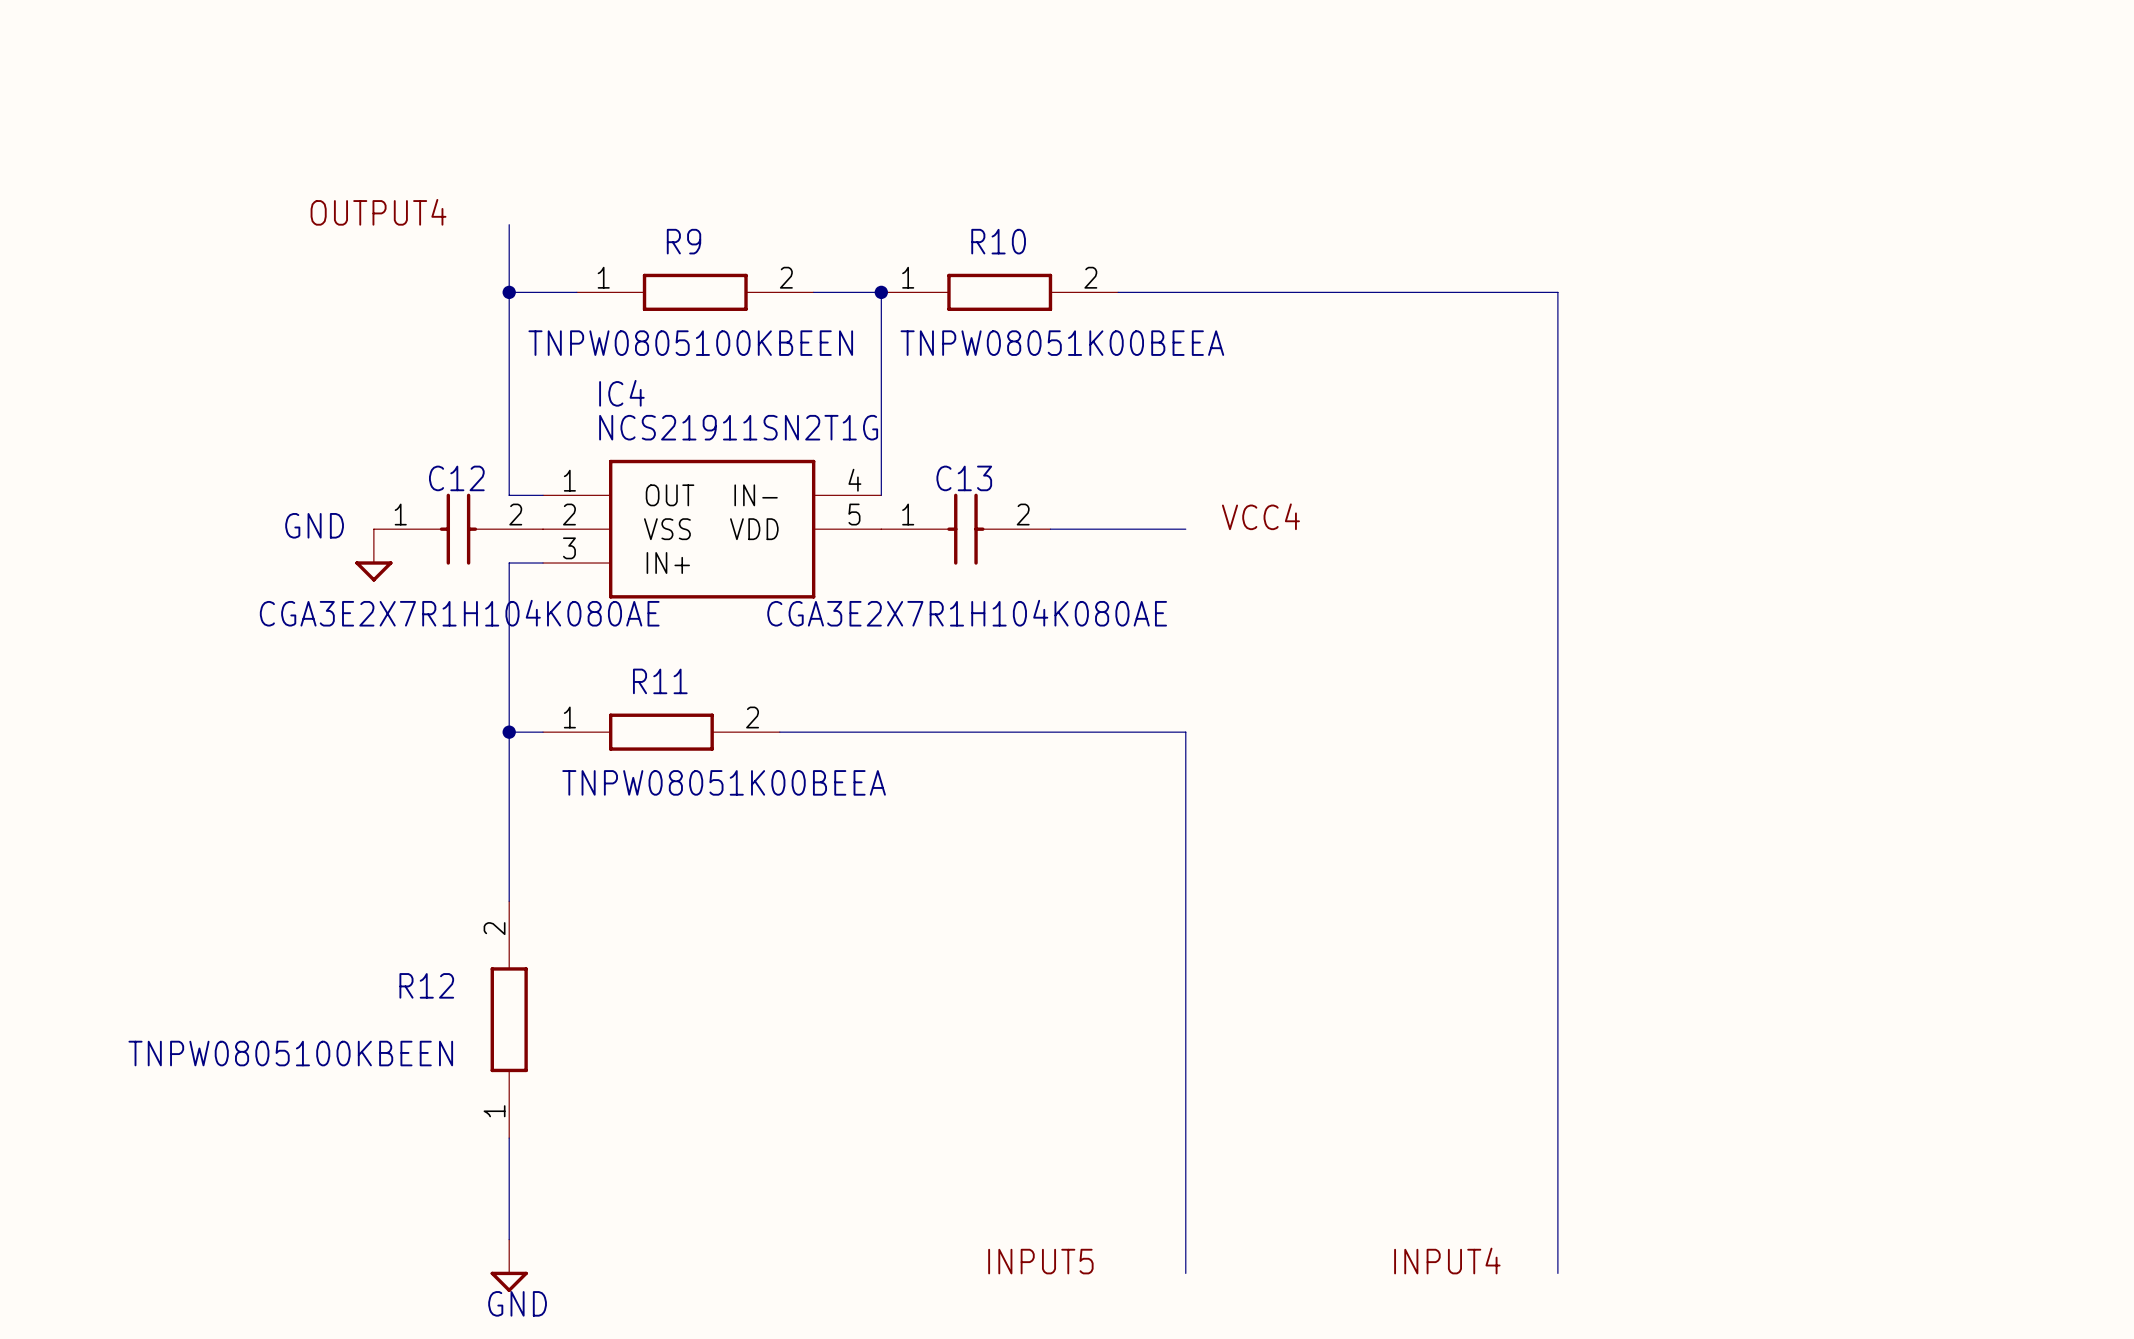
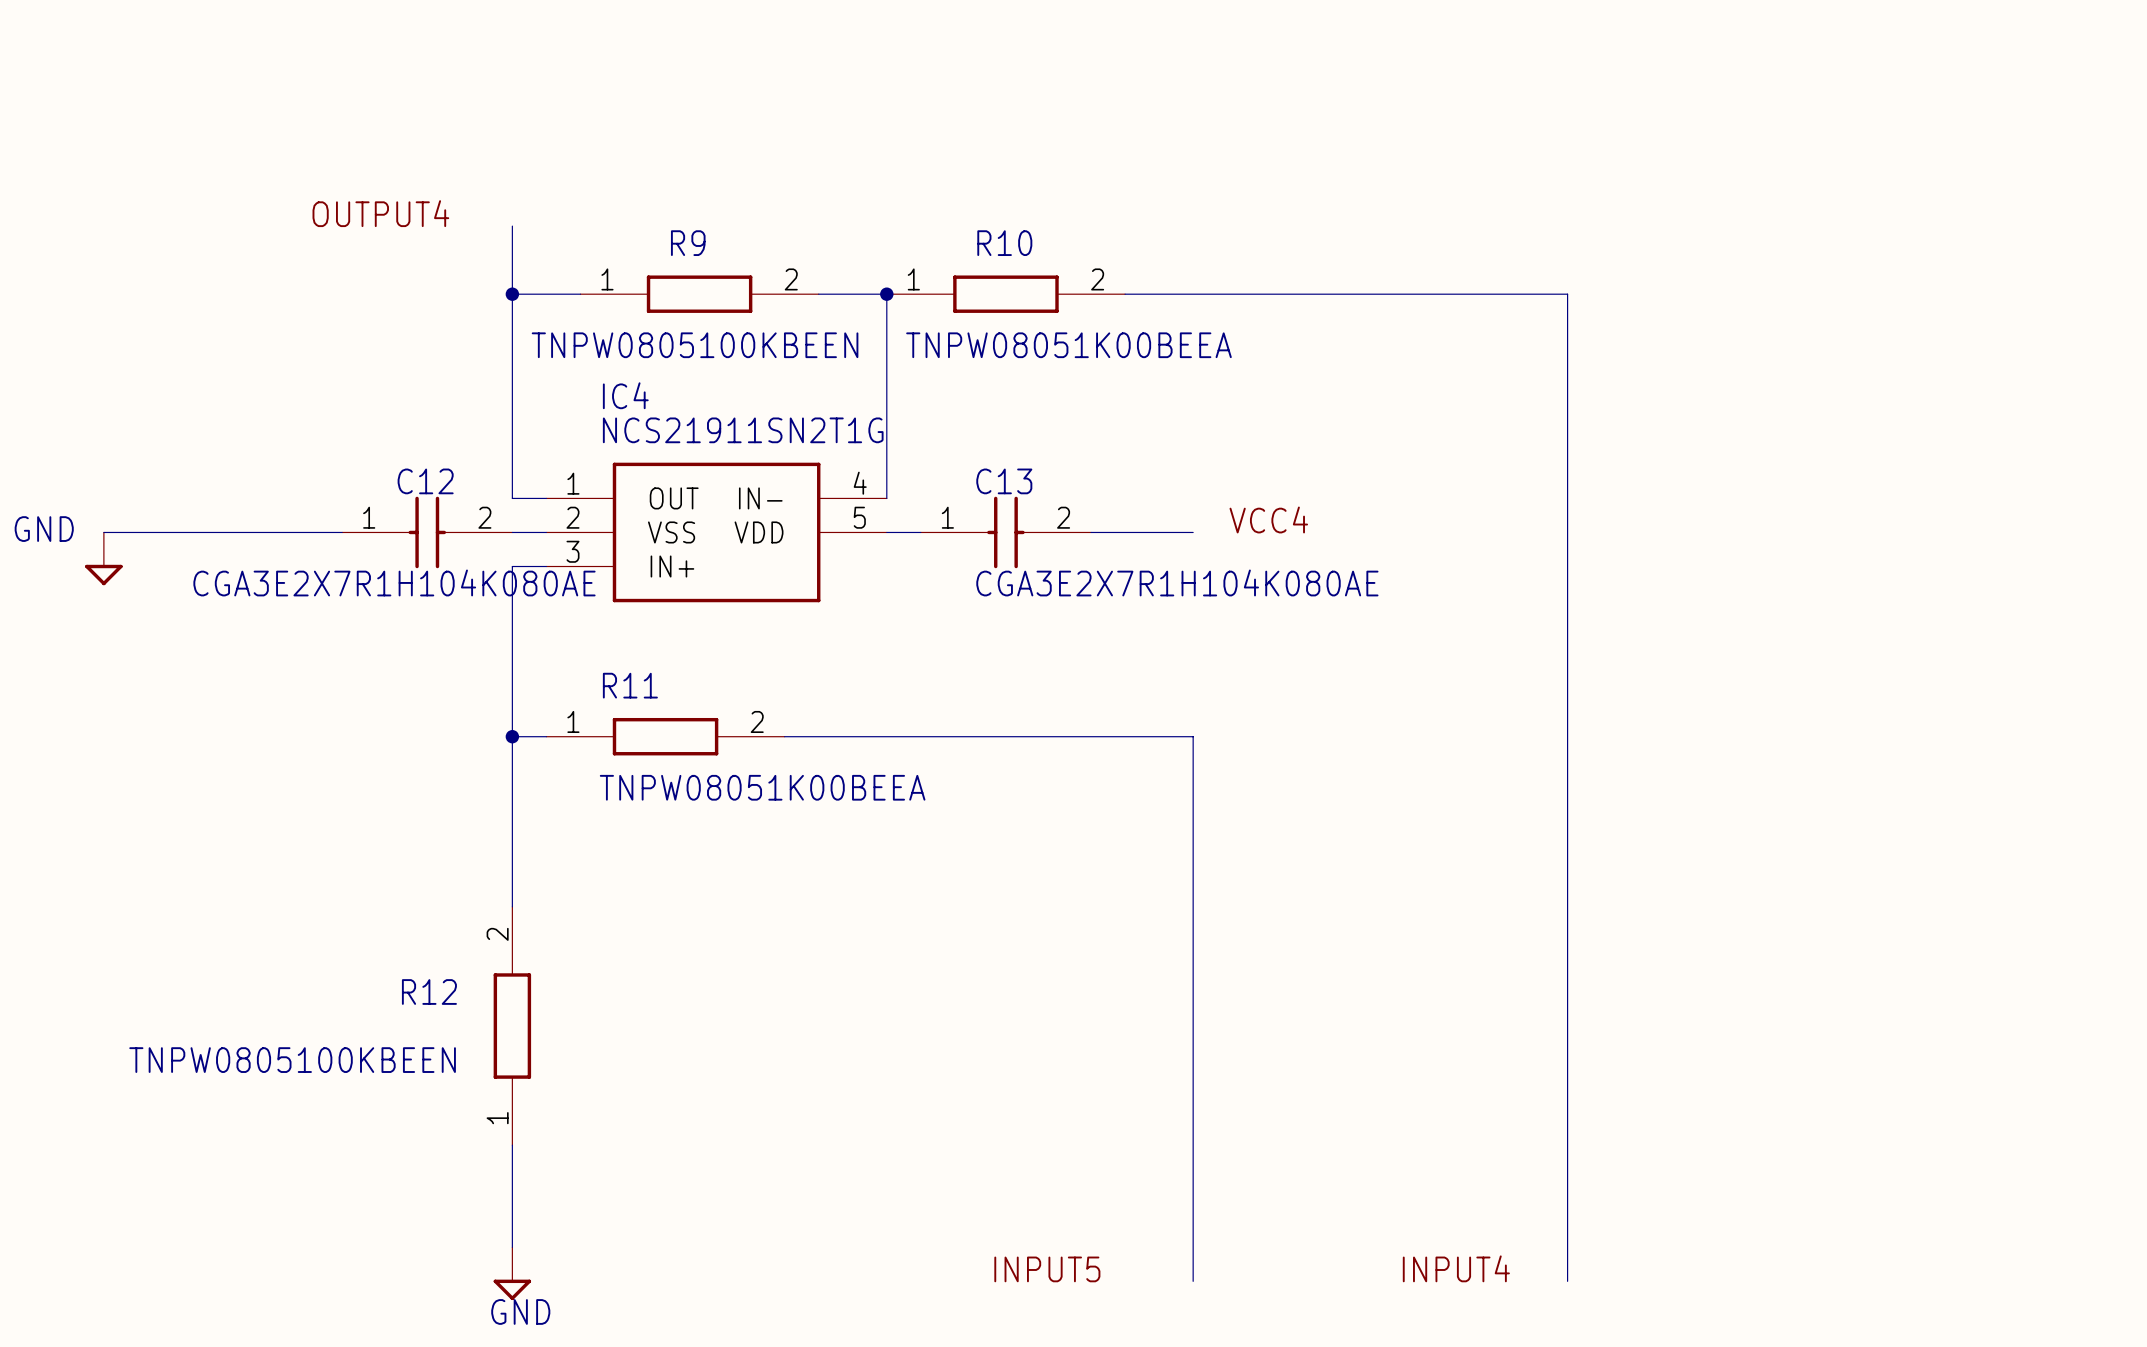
wire: none -> (103, 532) (342, 532)
C12 position: (458, 529) -> (427, 532)
C13 position: (965, 529) -> (1005, 532)
power symbol position: GND (373, 555) -> GND (103, 558)
C12 value position: CGA3E2X7R1H104K080AE (459, 613) -> CGA3E2X7R1H104K080AE (394, 582)
C13 value position: CGA3E2X7R1H104K080AE (967, 613) -> CGA3E2X7R1H104K080AE (1177, 582)
R11 name position: R11 (660, 681) -> R11 (630, 685)
R11 value position: TNPW08051K00BEEA (724, 782) -> TNPW08051K00BEEA (762, 787)

